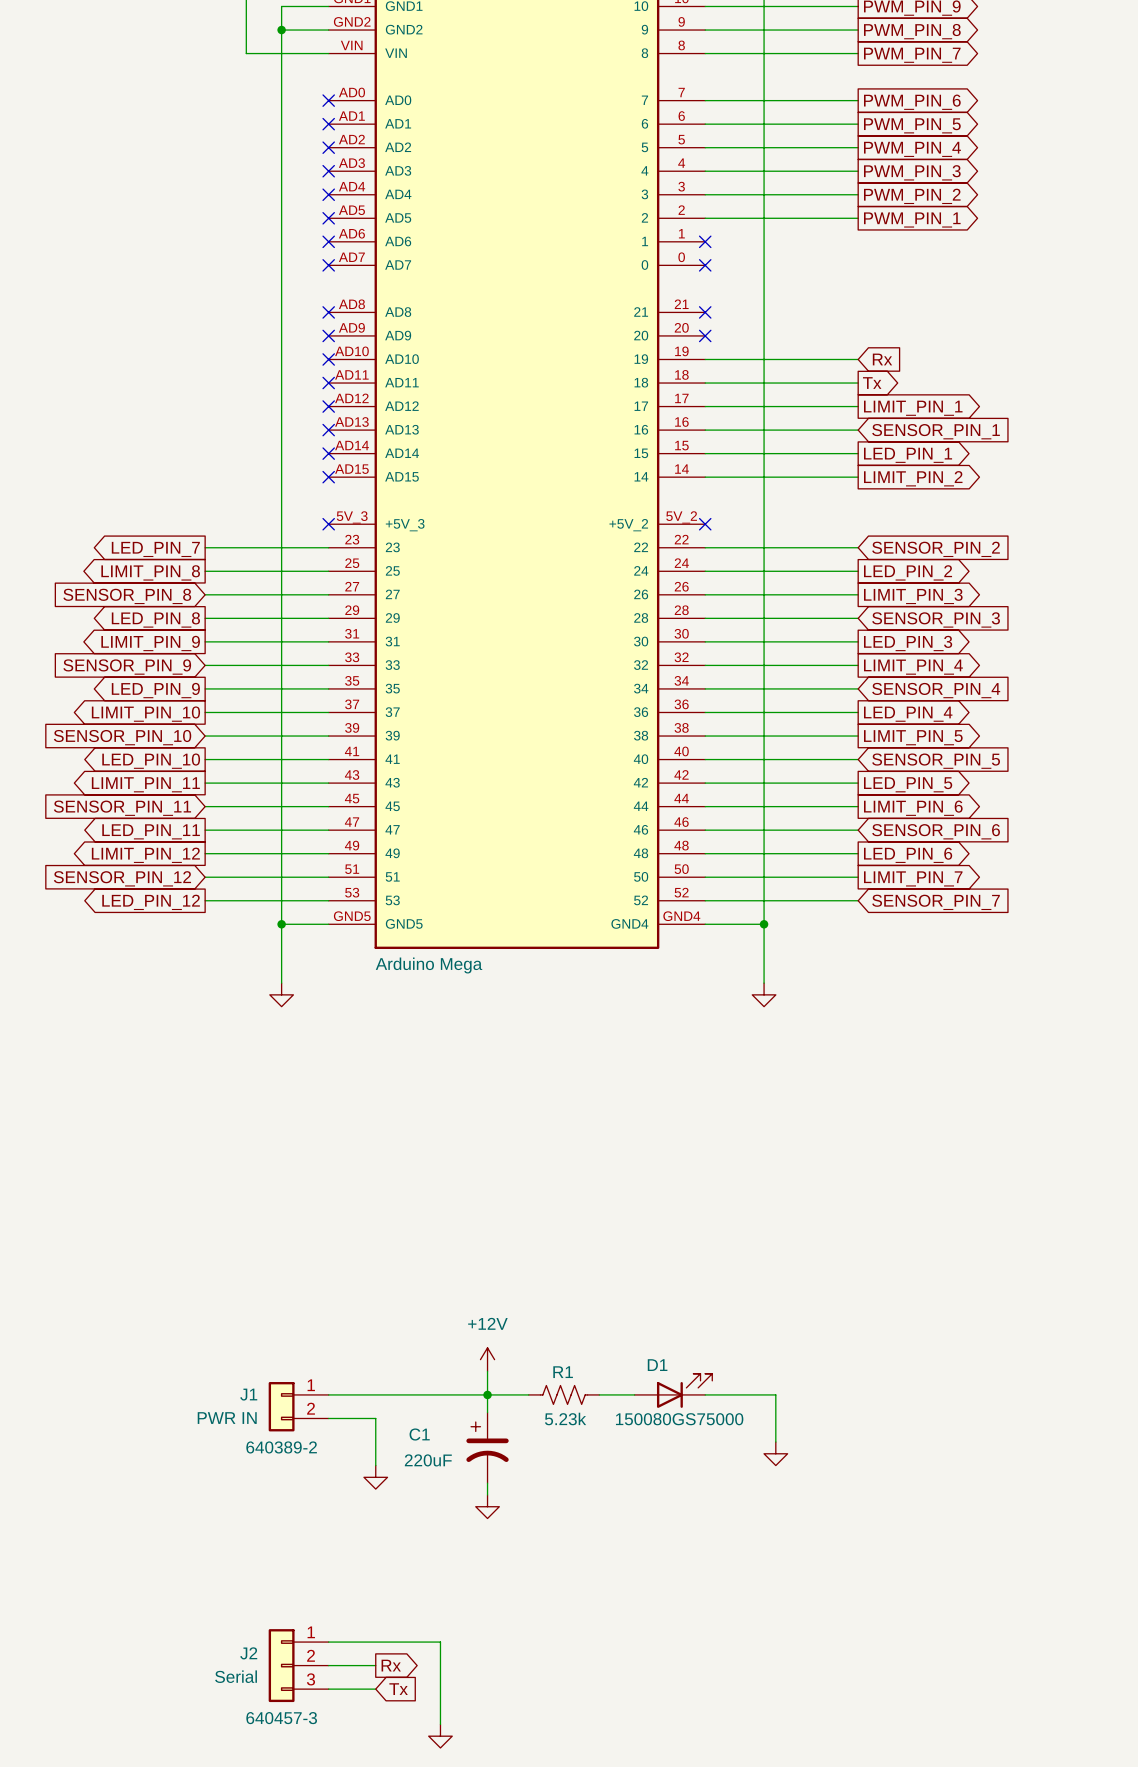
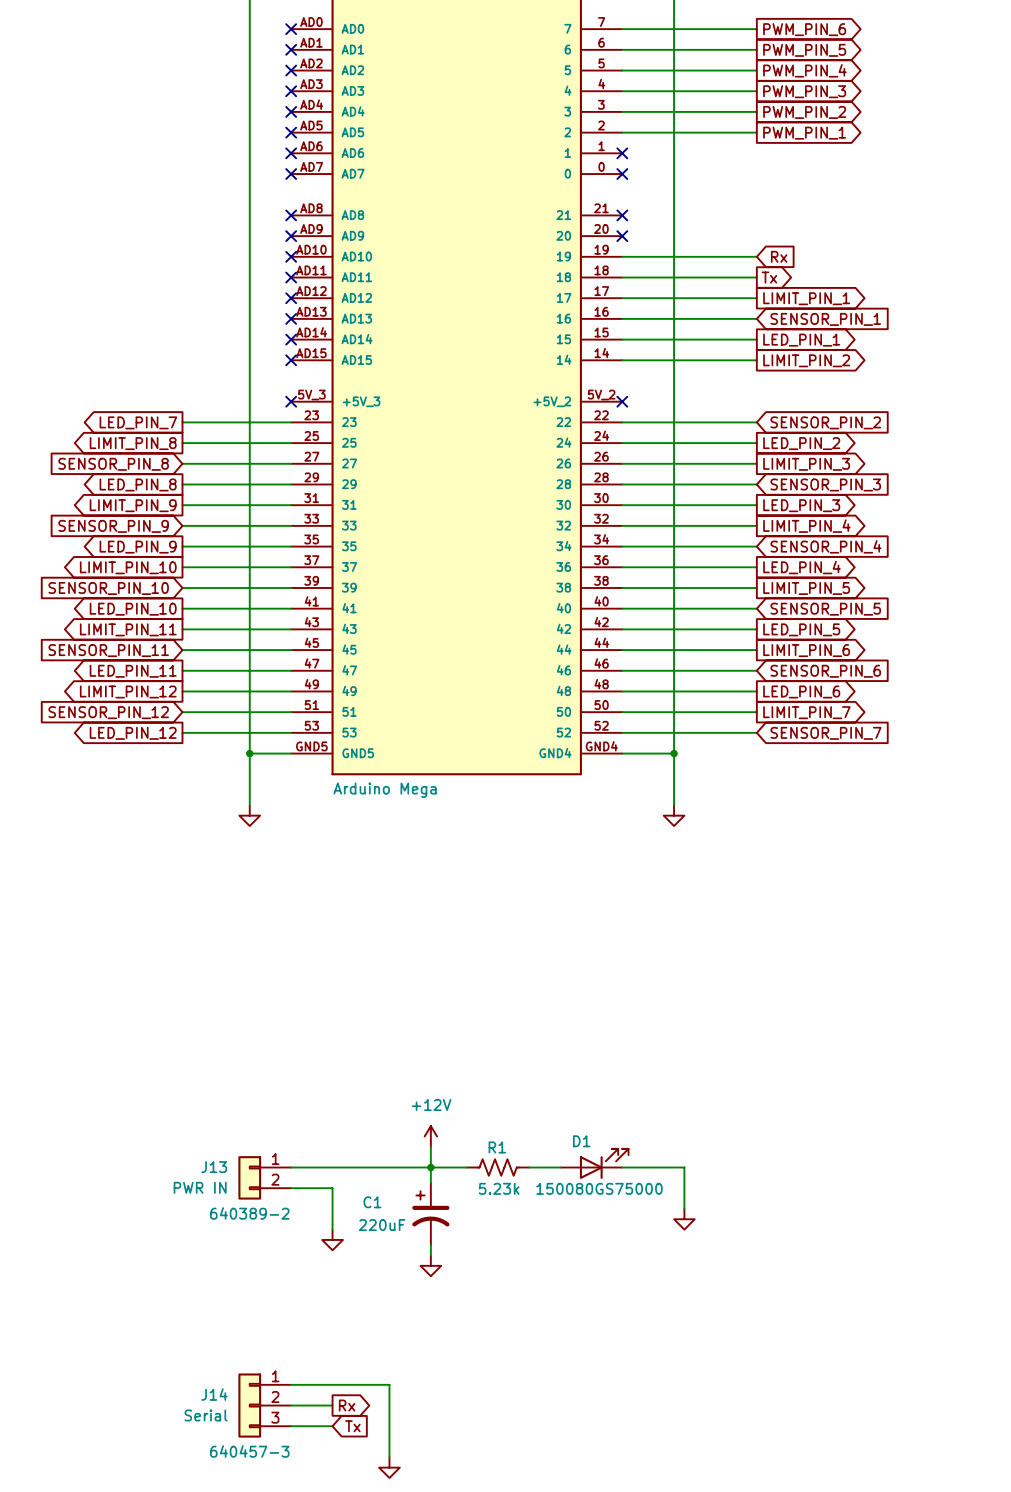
J1 name: J1 (248, 1394) -> J13 (214, 1167)
J2 name: J2 (248, 1653) -> J14 (214, 1394)

